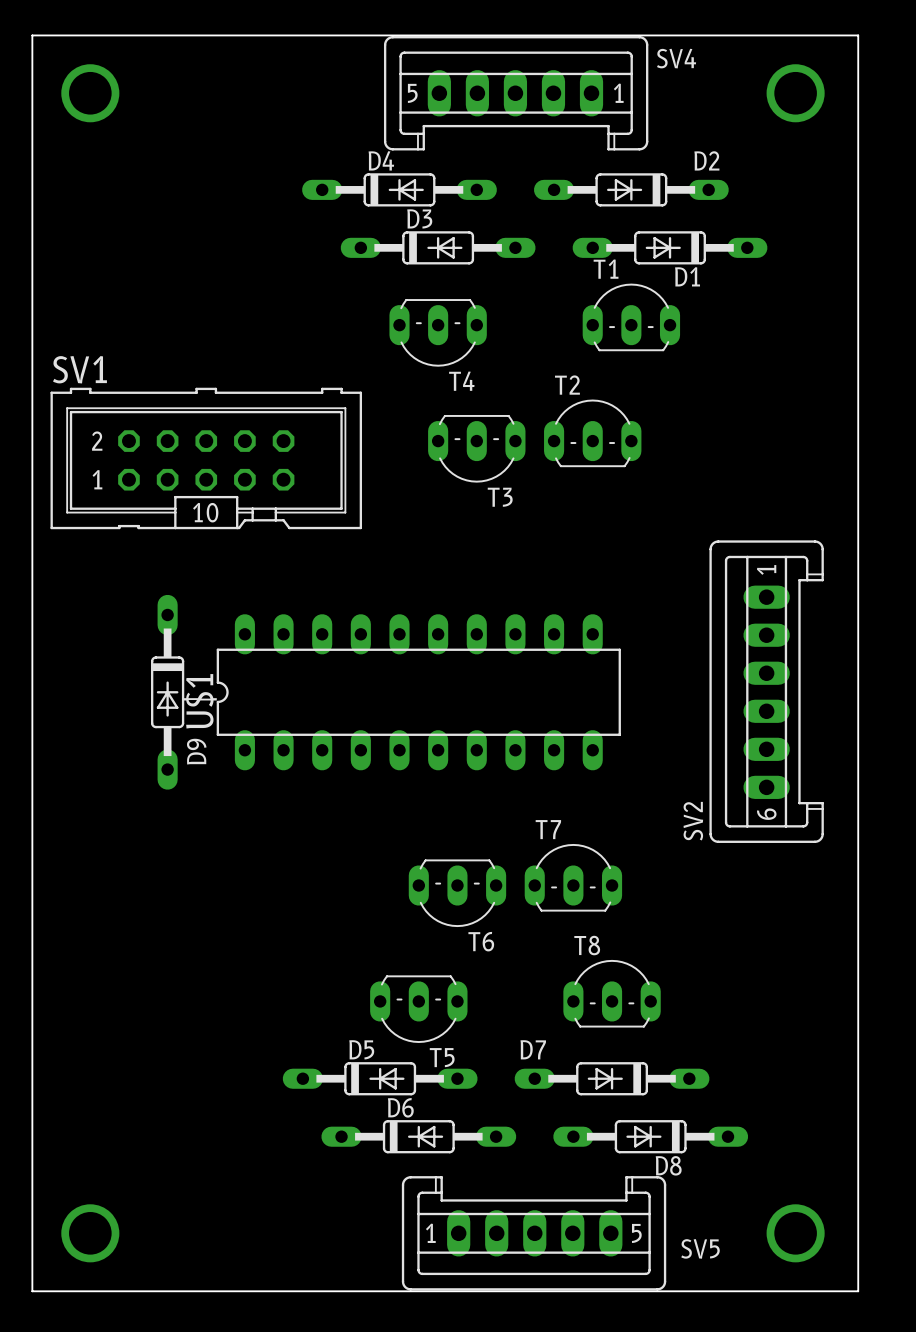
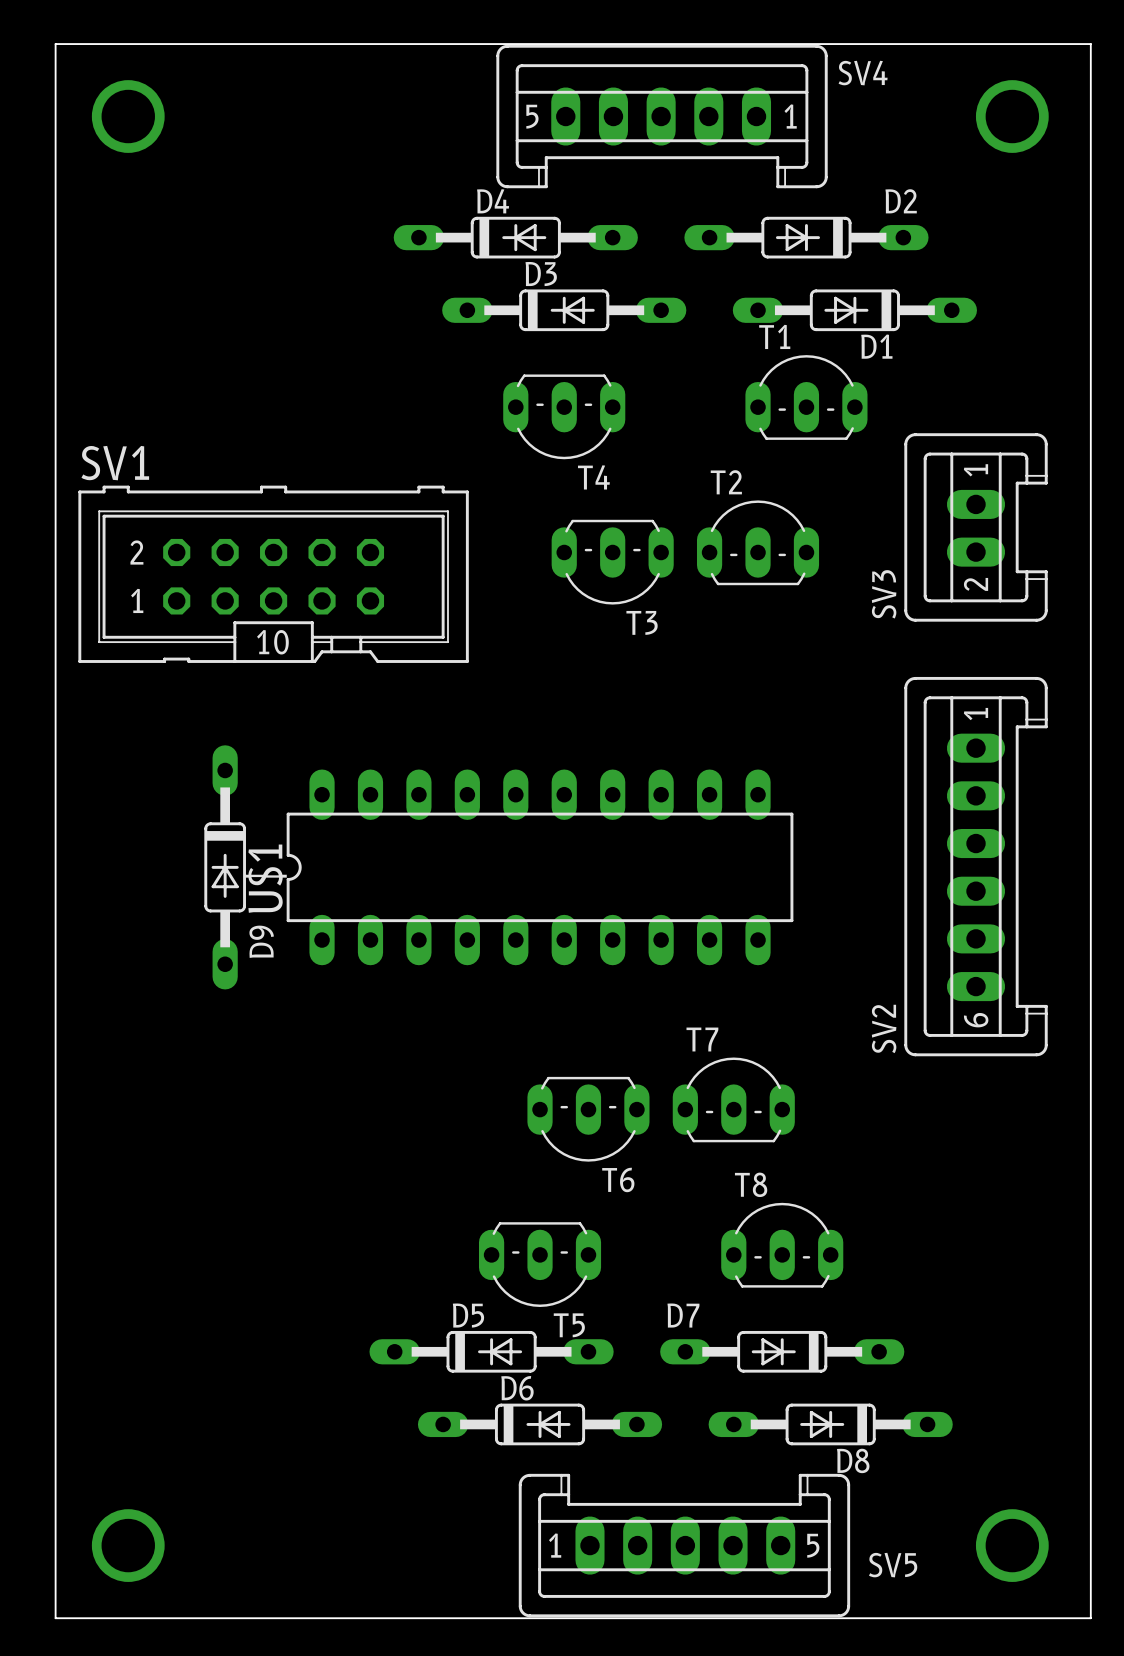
SV3: none -> (976, 527)

